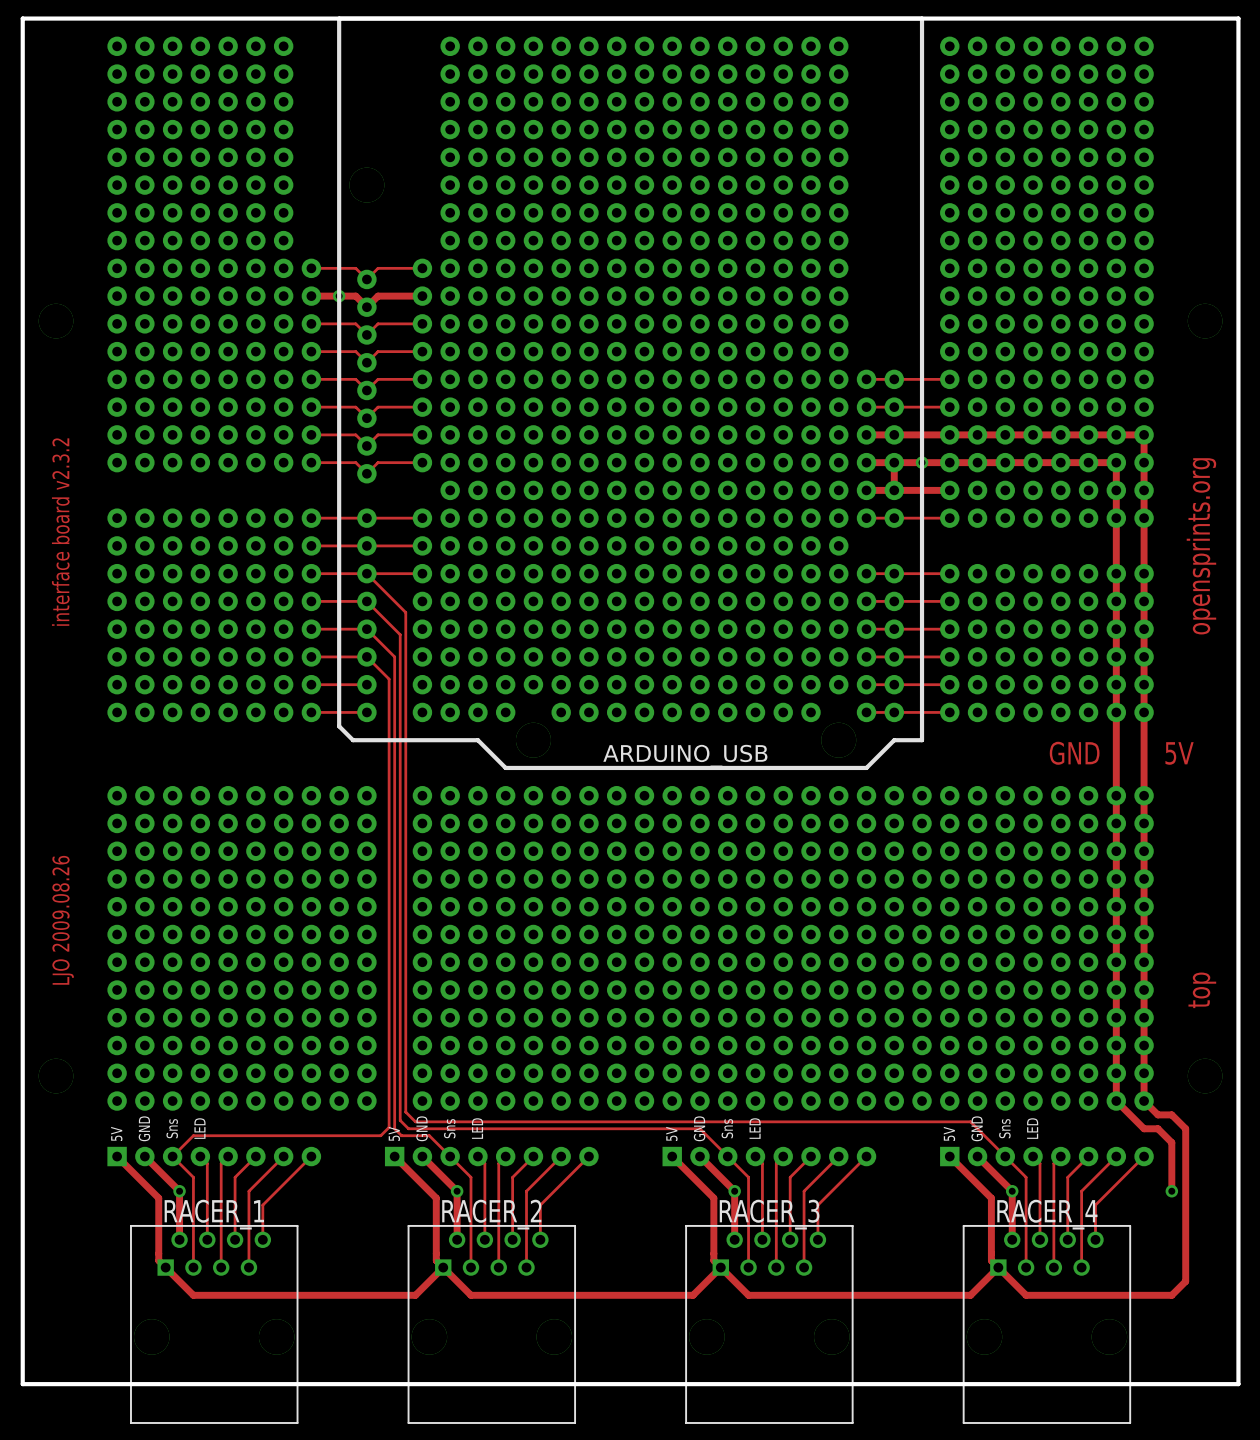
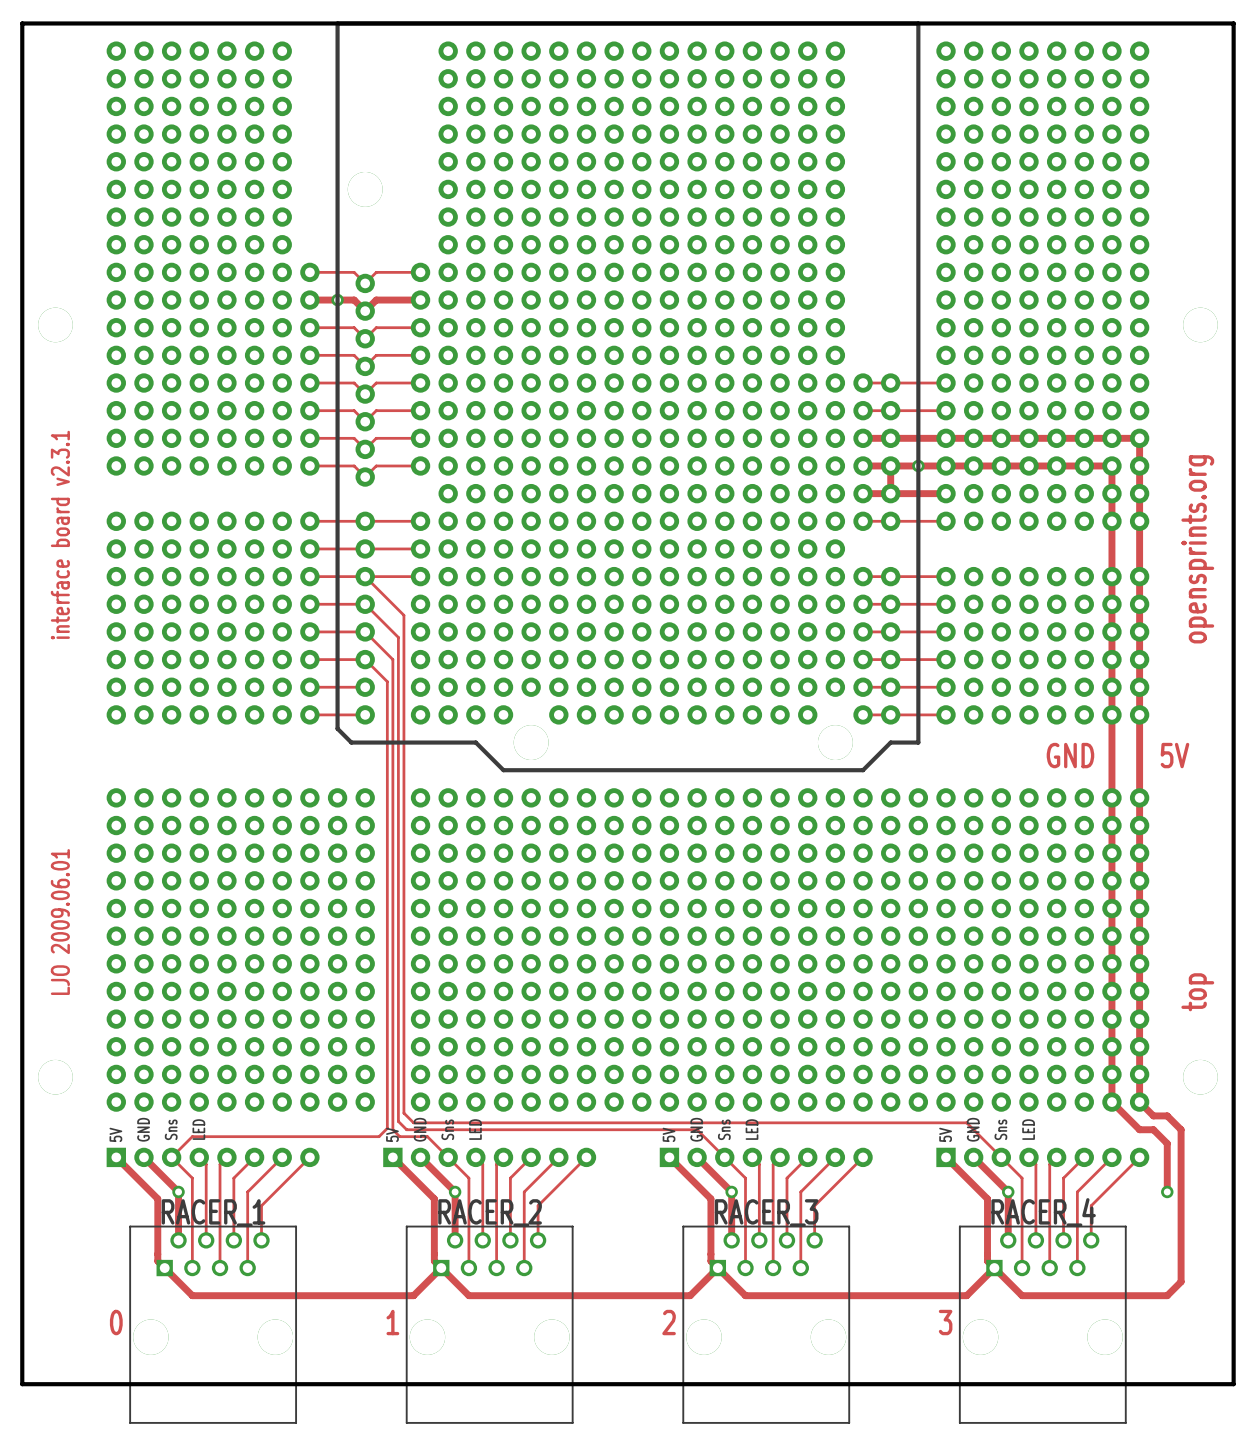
text: interface board v2.3.2 (60, 532) -> interface board v2.3.1 (60, 535)
part value: ARDUINO_USB (685, 756) -> none
text: LJO 2009.08.26 (63, 920) -> LJO 2009.06.01 (60, 922)
text: none -> 0 (116, 1322)
text: none -> 1 (392, 1322)
text: none -> 2 (669, 1322)
text: none -> 3 (945, 1322)

